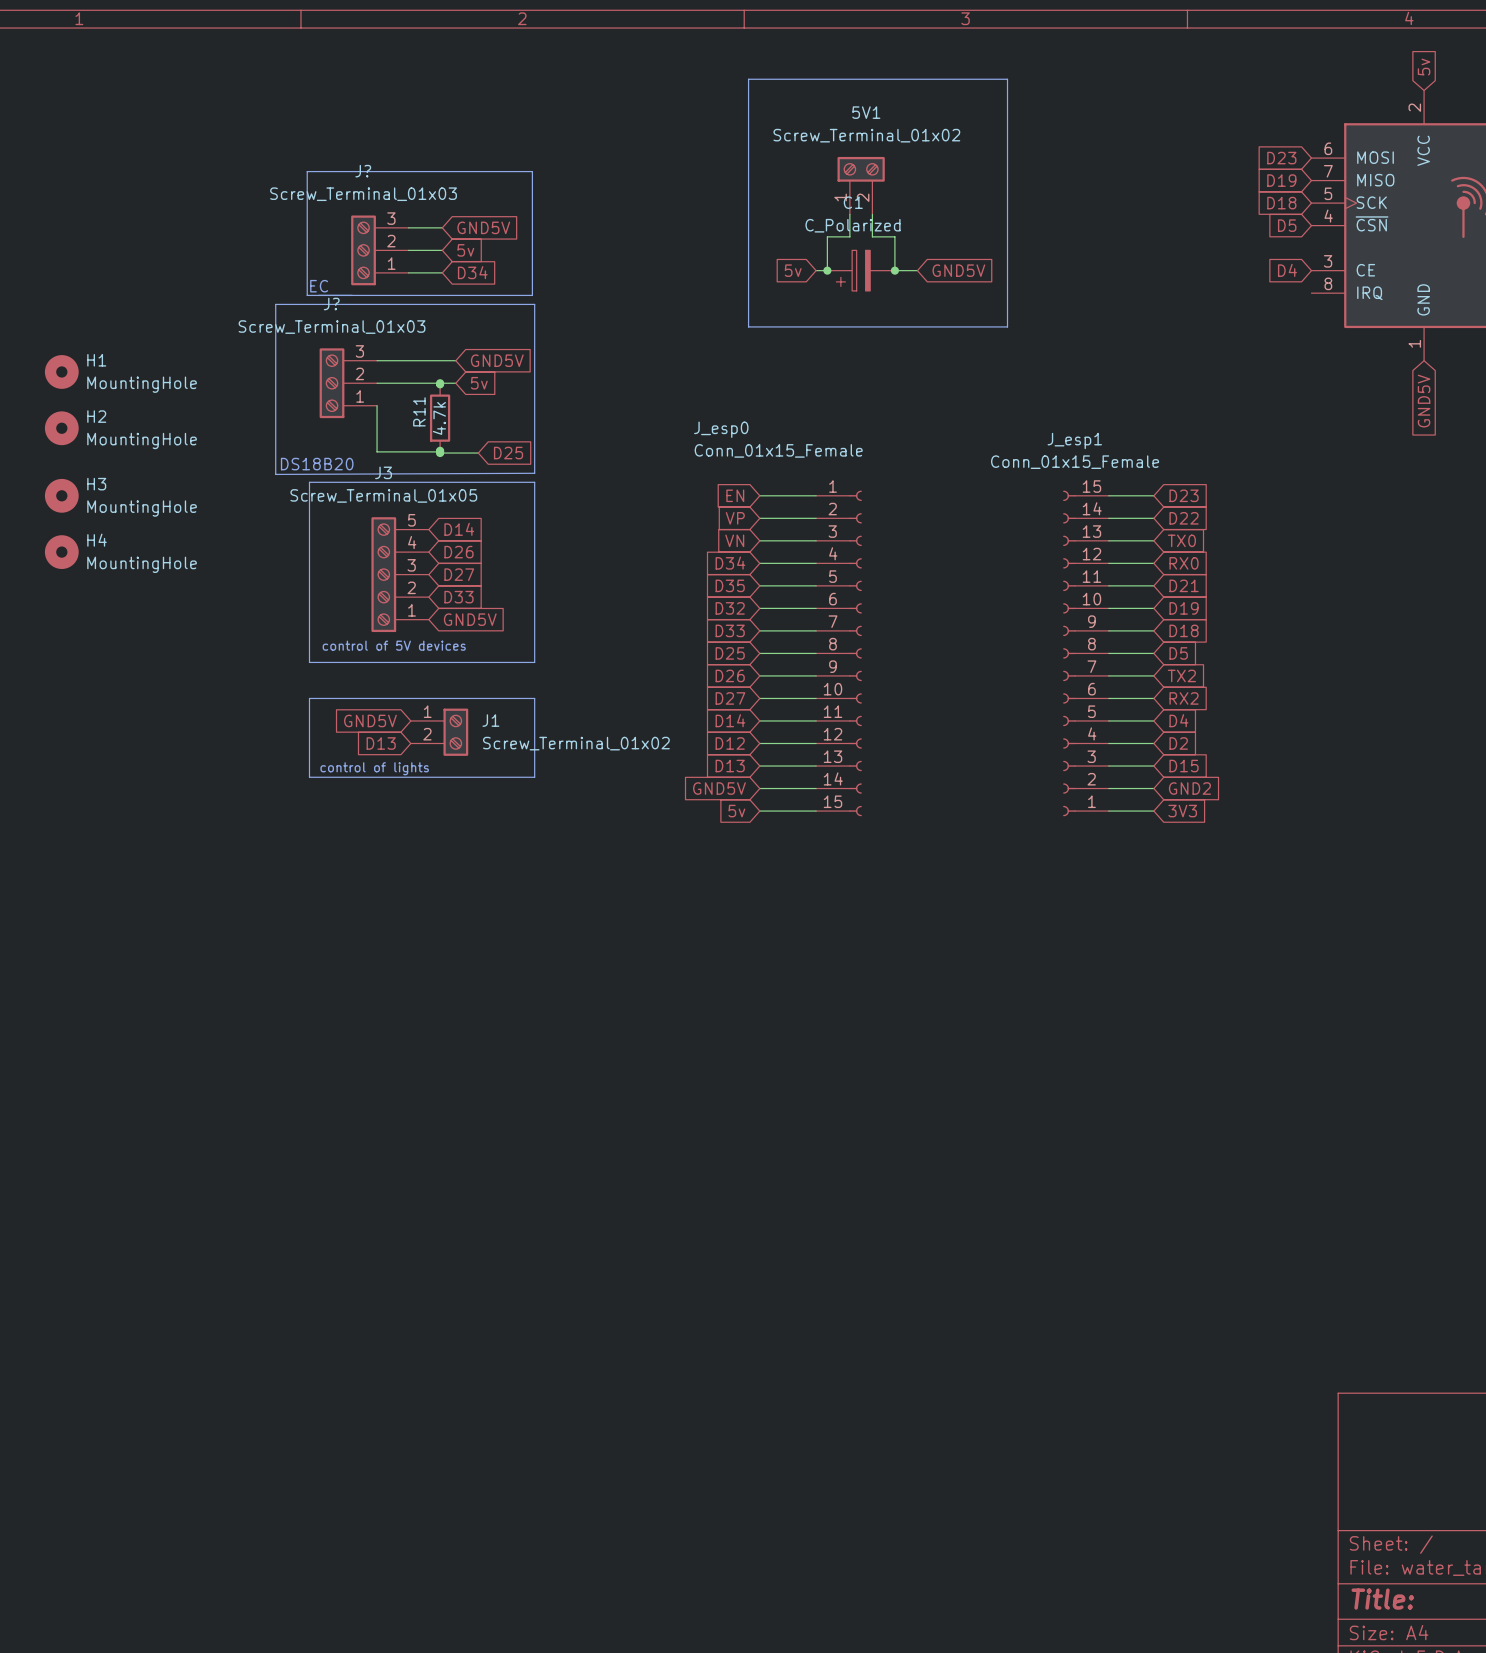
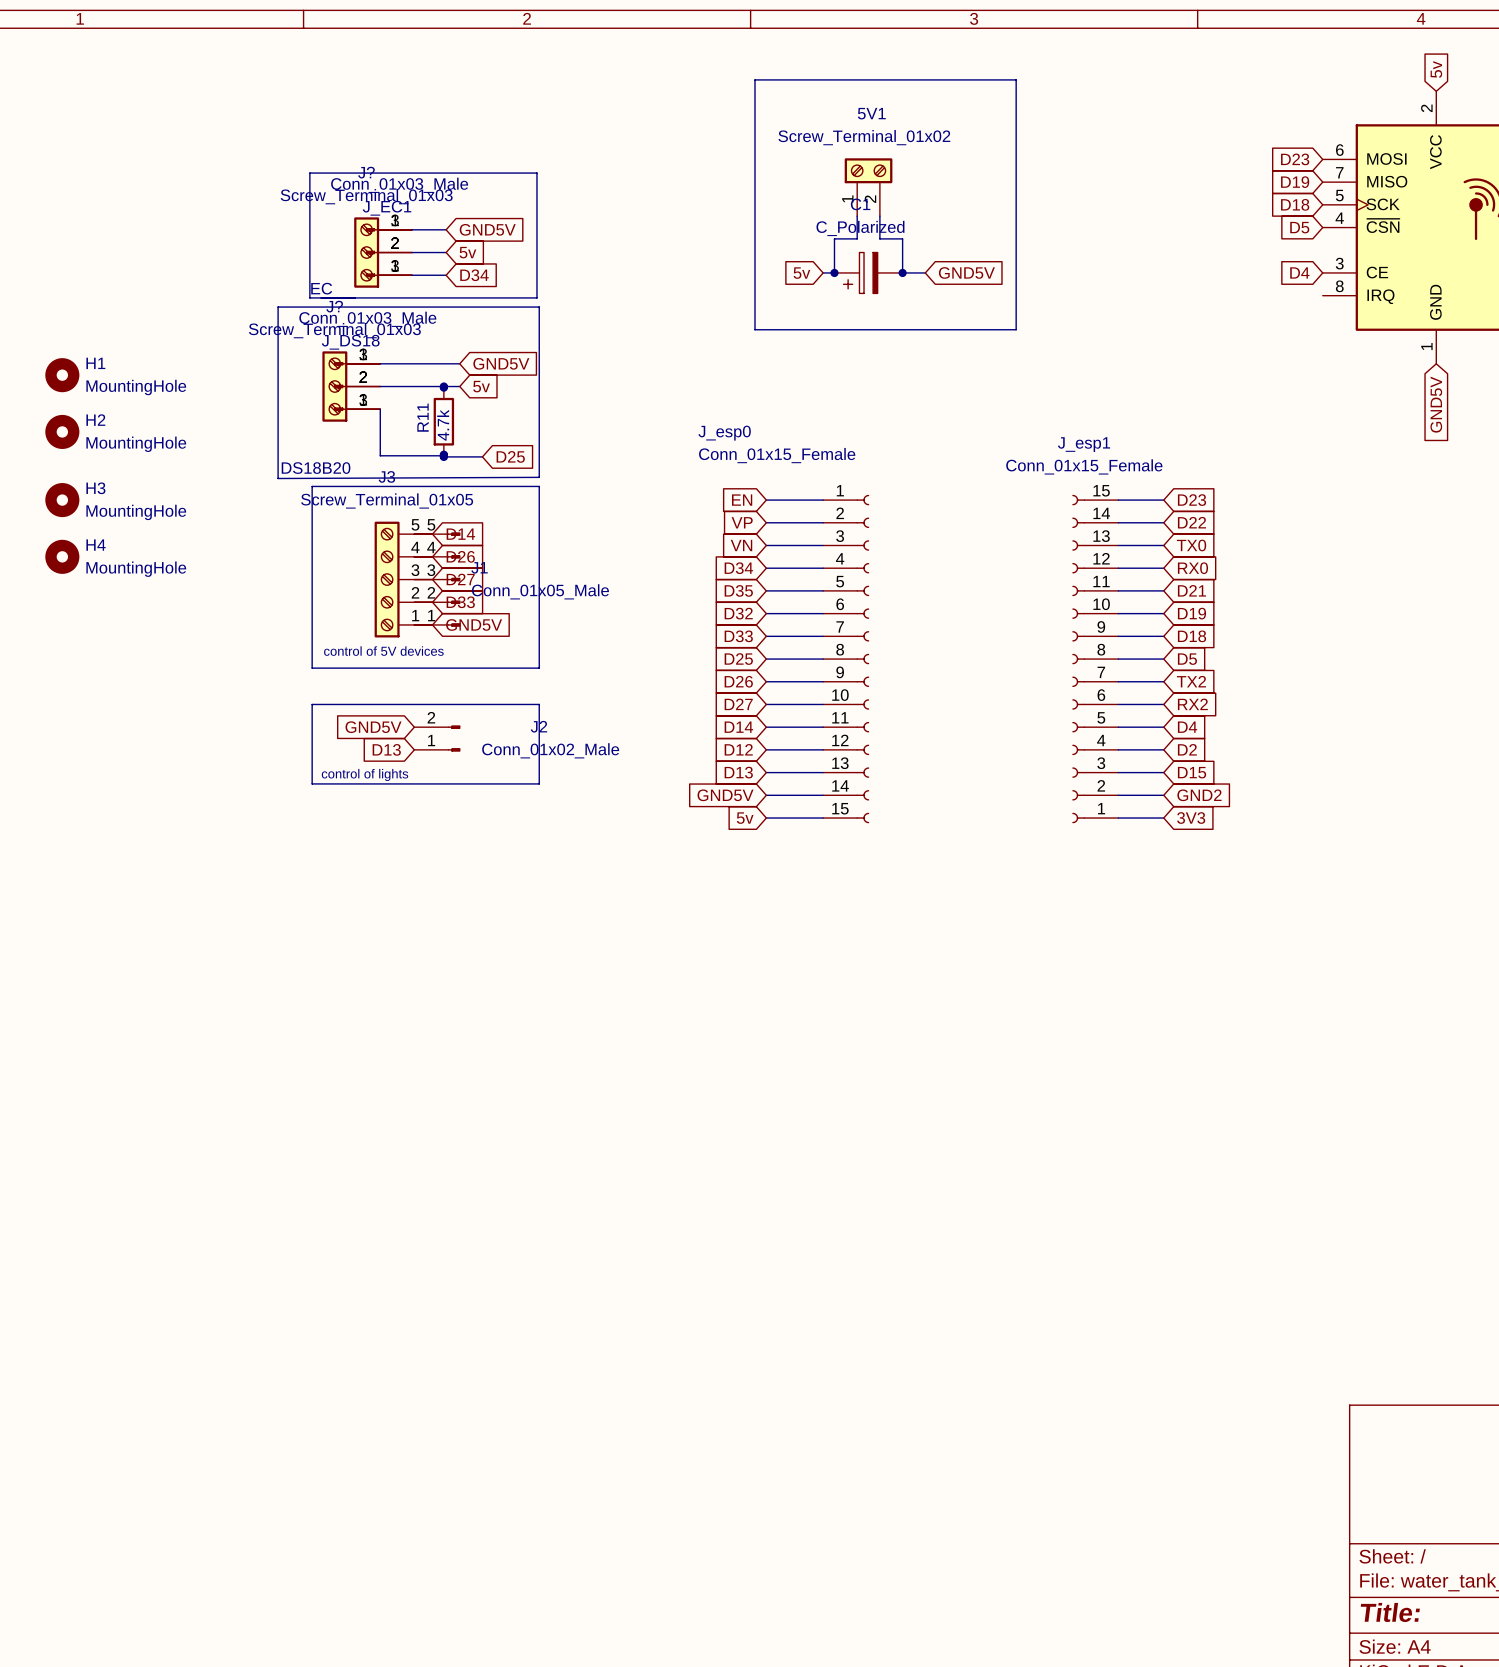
J_EC1: none -> Conn_01x03_Male (389, 252)
J_DS18: none -> Conn_01x03_Male (357, 386)
J1 symbol: [410, 708, 469, 756] -> [414, 532, 461, 627]
J2: none -> Conn_01x02_Male (437, 738)
J1 value: Screw_Terminal_01x02 (576, 743) -> Conn_01x05_Male (540, 591)

